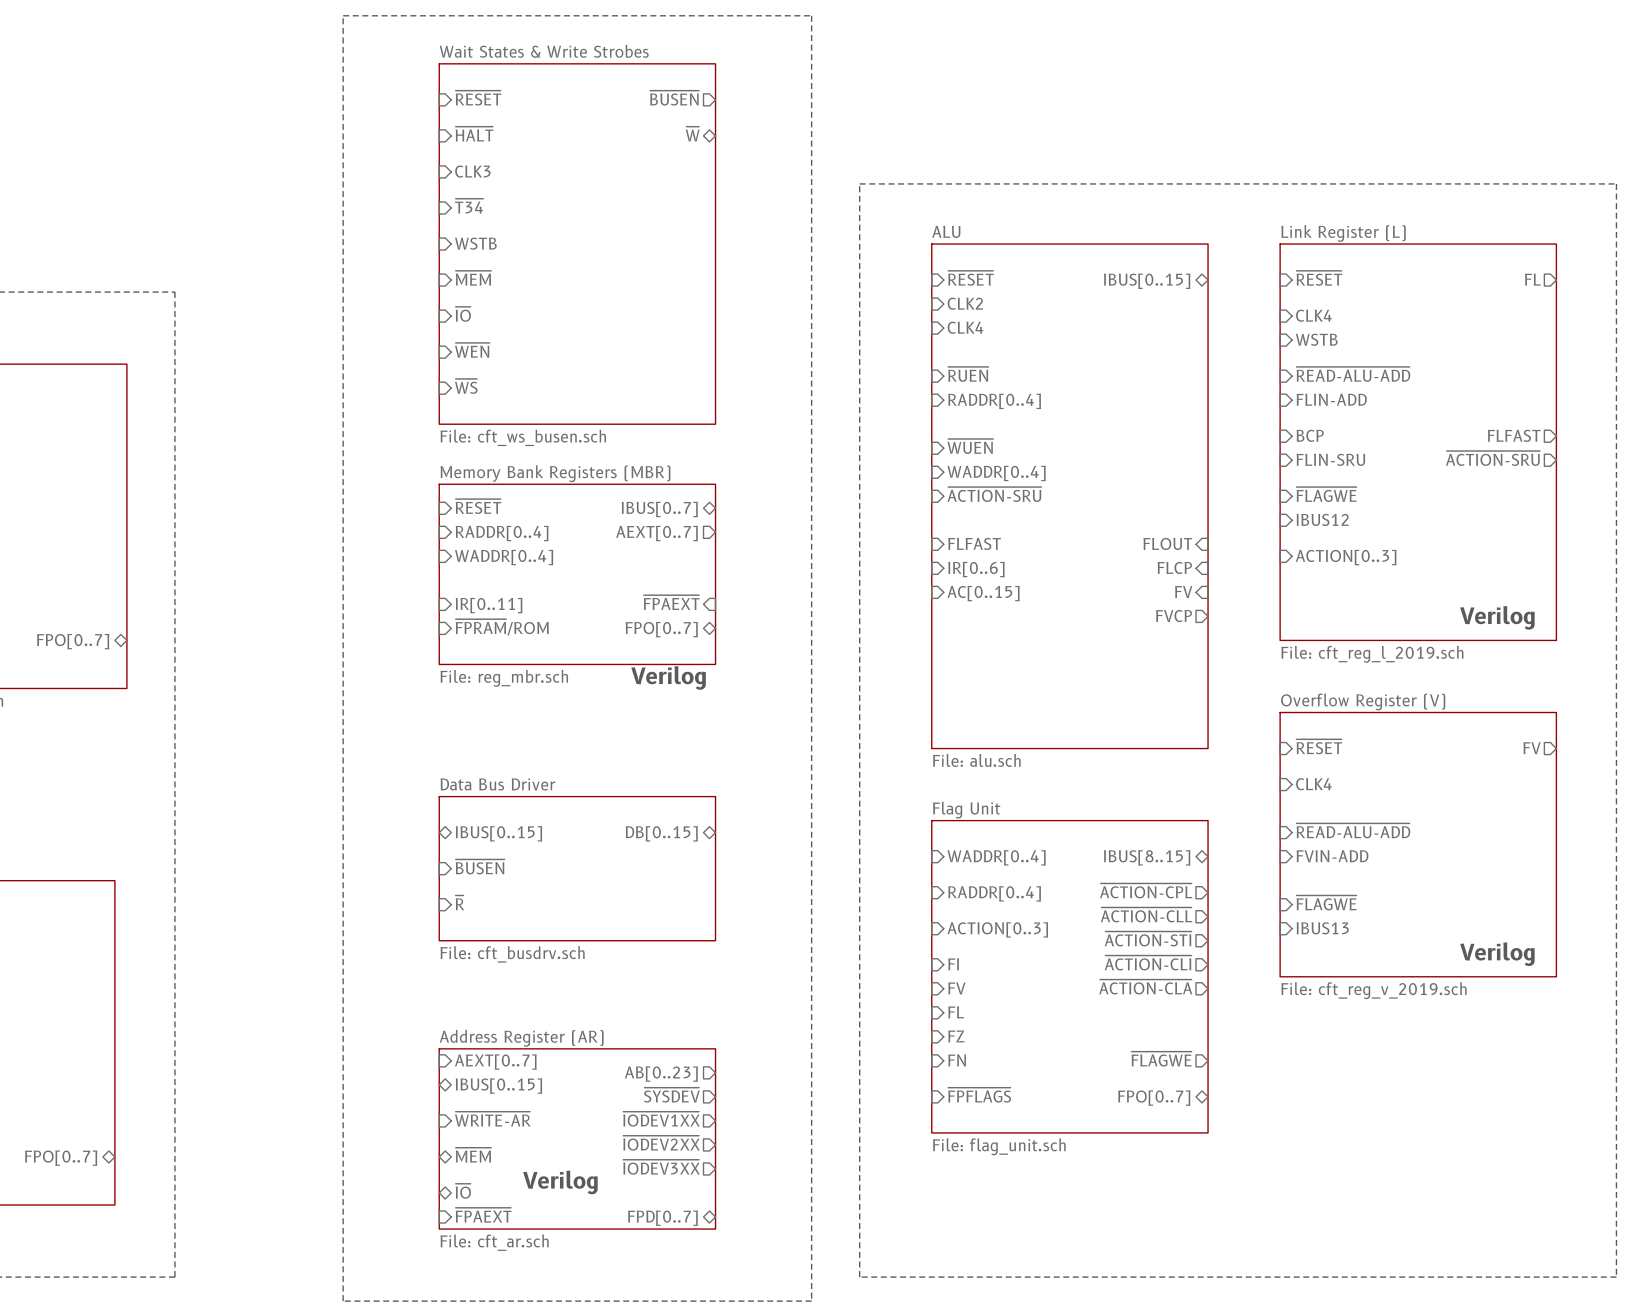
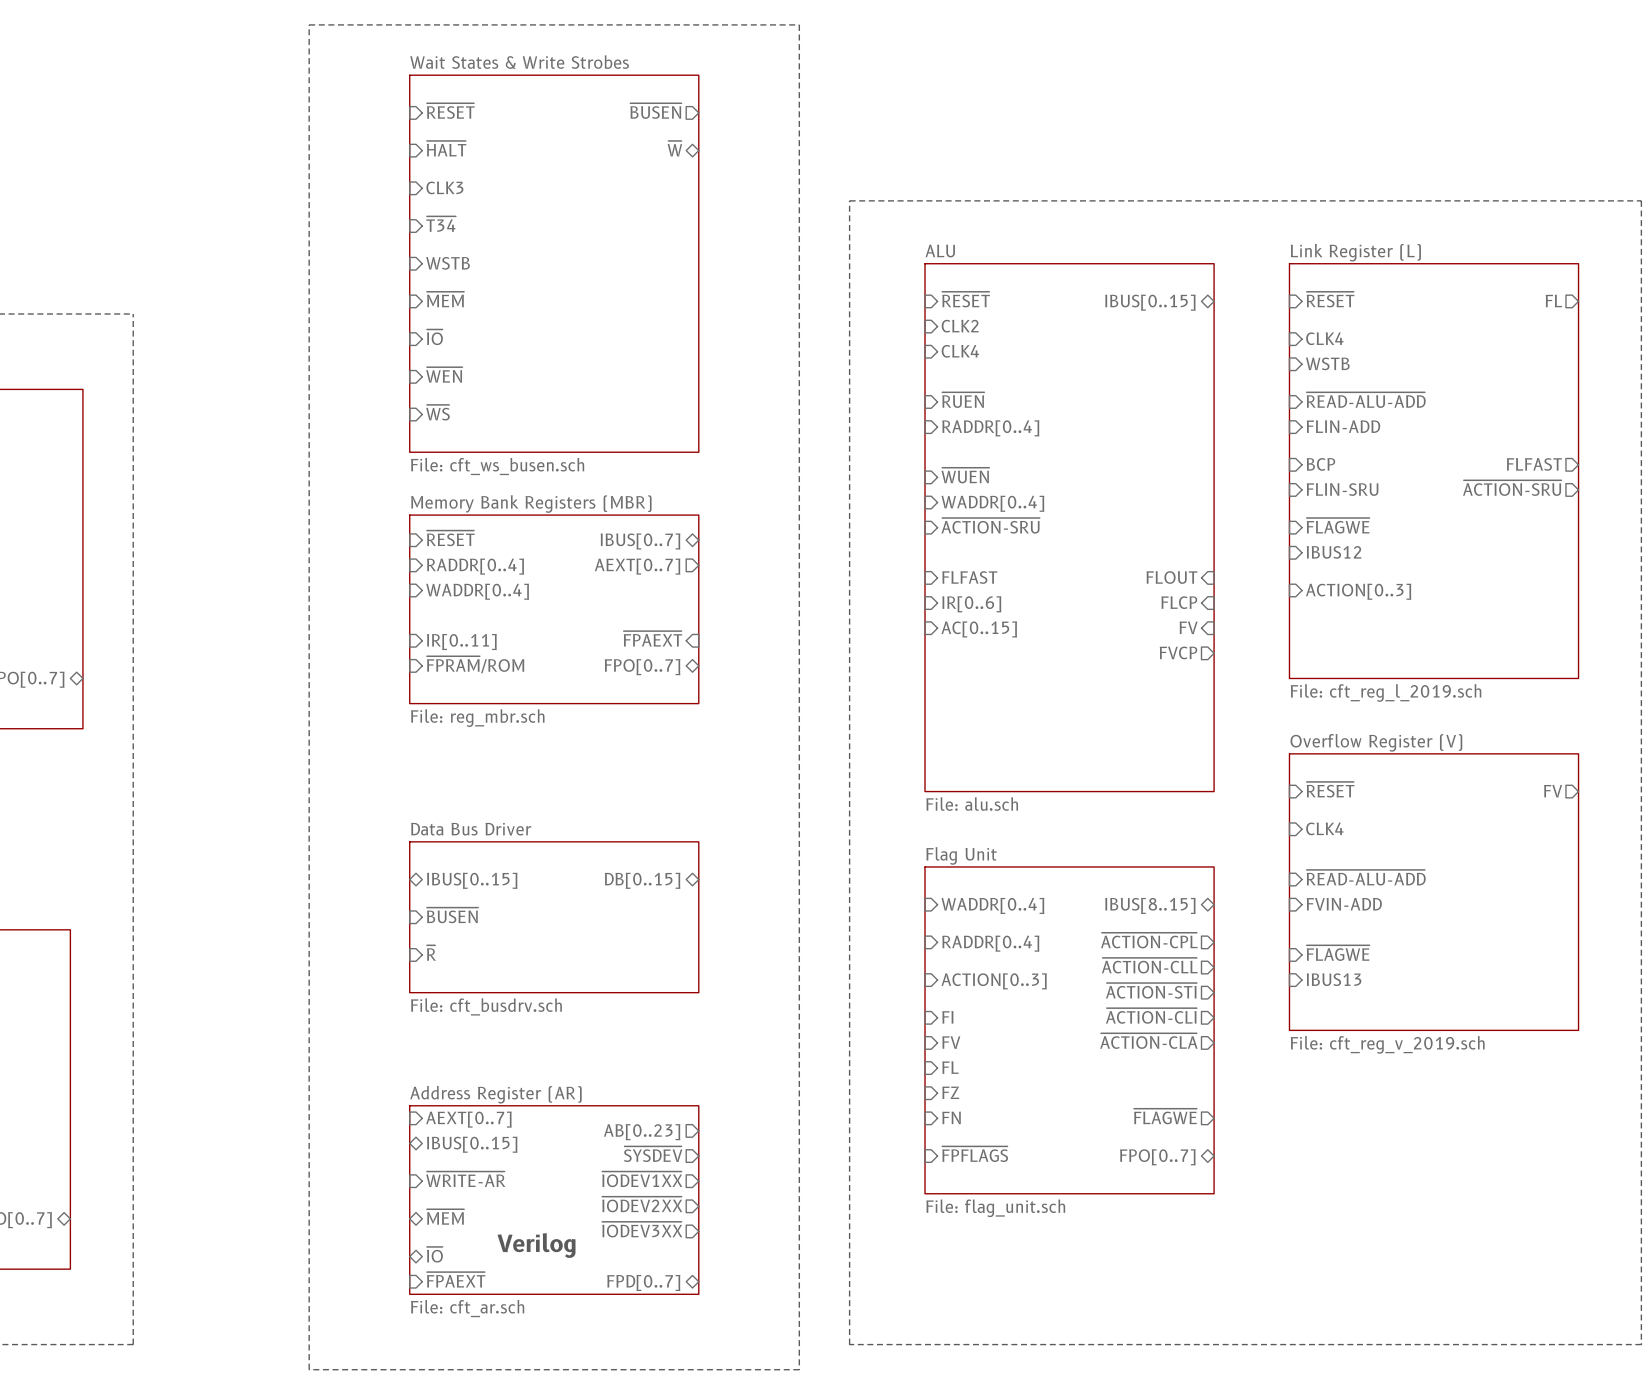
text: Verilog (1497, 617) -> none
text: Verilog (668, 677) -> none
text: Verilog (1497, 954) -> none

